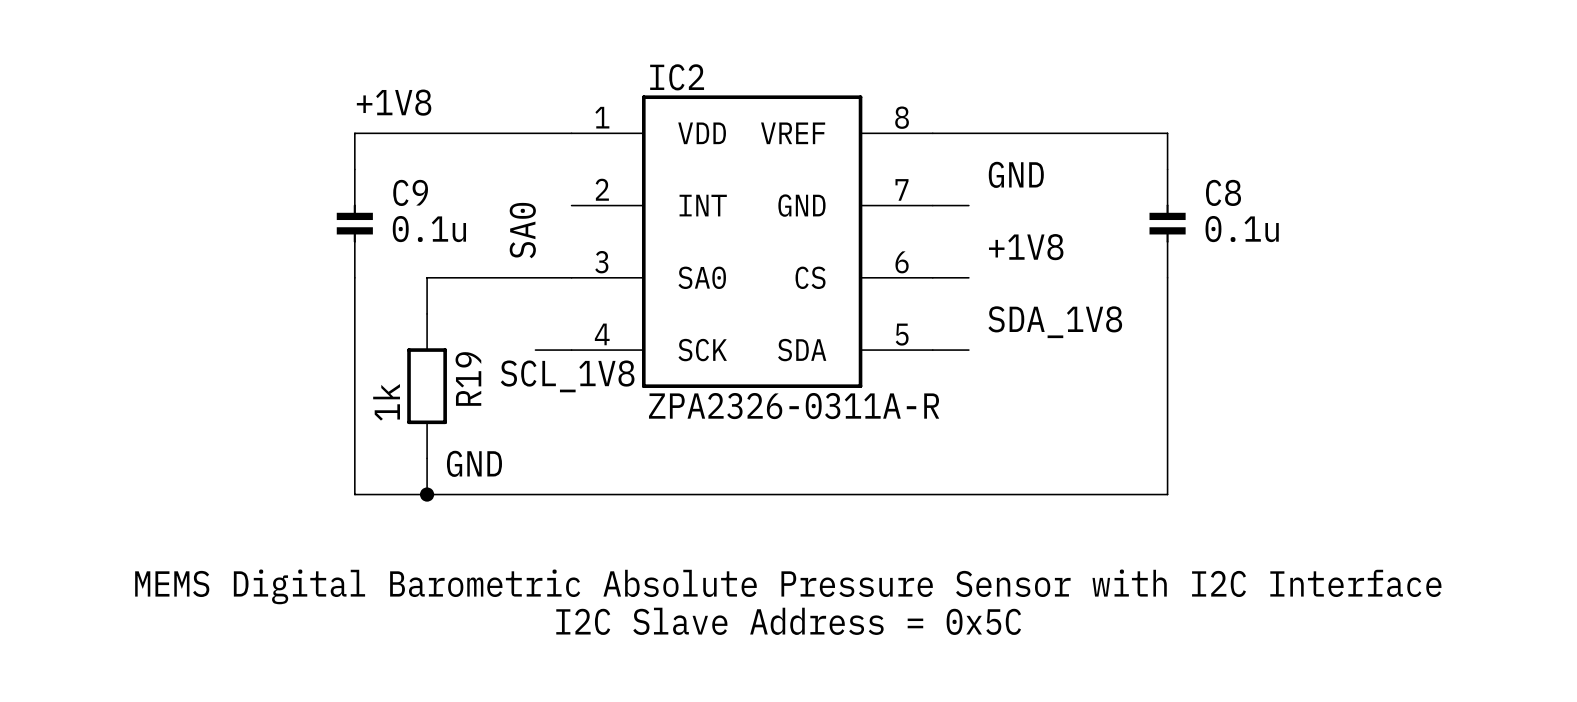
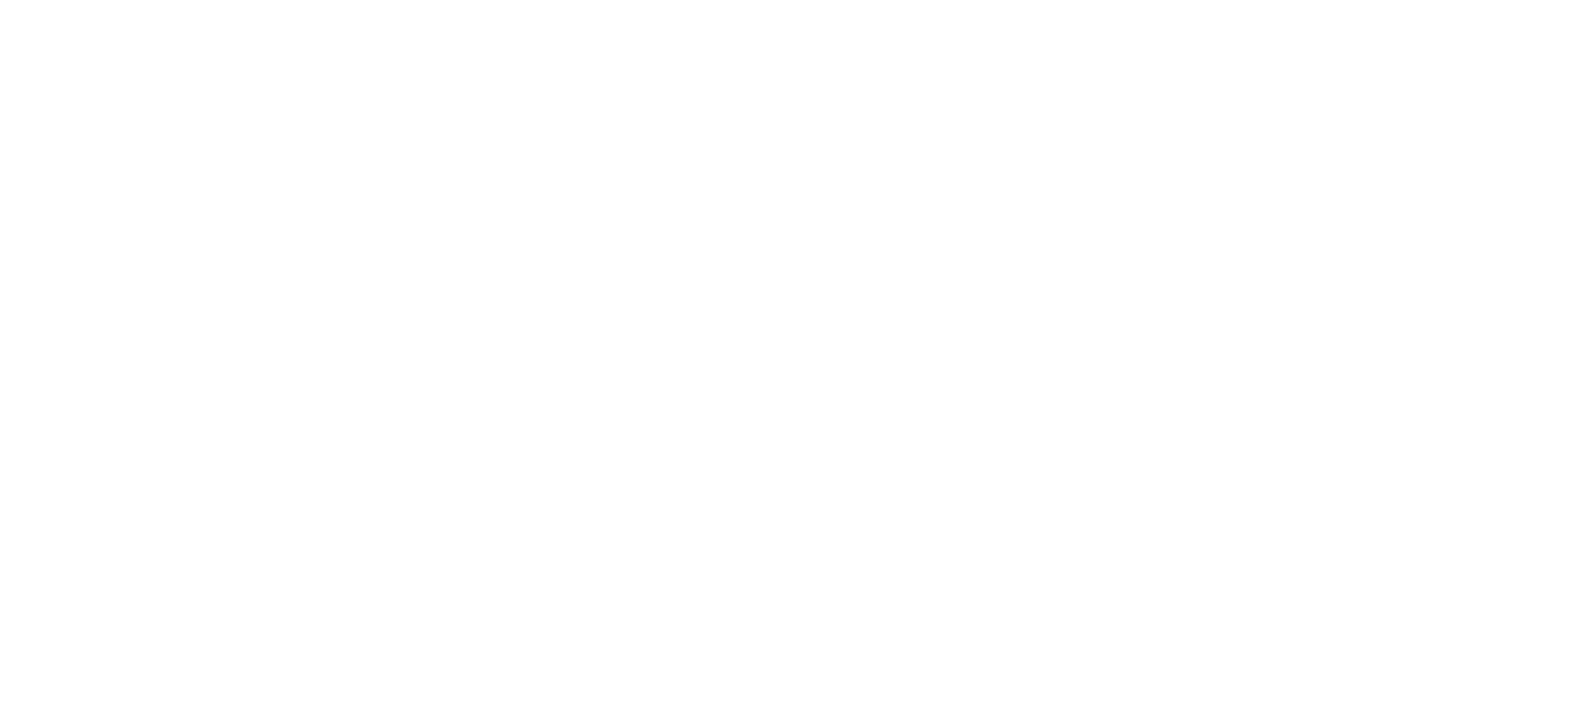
label: +1V8 (394, 102) -> none
wire: (571, 133) (354, 133) (354, 169) -> none
wire: (932, 133) (1167, 133) (1167, 169) -> none
label: GND (1016, 174) -> none
wire: (932, 205) (968, 205) -> none
C9: 0.1u (354, 223) -> none
C8: 0.1u (1167, 223) -> none
label: SA0 (522, 230) -> none
IC2: (752, 241) -> none
label: +1V8 (1026, 247) -> none
wire: (354, 277) (354, 494) (1167, 494) (1167, 277) -> none
wire: (571, 277) (427, 277) (427, 313) -> none
wire: (932, 277) (968, 277) -> none
label: SDA_1V8 (1055, 322) -> none
wire: (535, 350) (571, 350) -> none
wire: (932, 350) (968, 350) -> none
label: SCL_1V8 (567, 376) -> none
R19: 1k (427, 386) -> none
wire: (427, 458) (427, 494) -> none
label: GND (474, 463) -> none
junction: (427, 494) -> none
text: MEMS Digital Barometric Absolute Pressure Sensor with I2C Interface (788, 586) -> none
text: I2C Slave Address = 0x5C (788, 621) -> none

